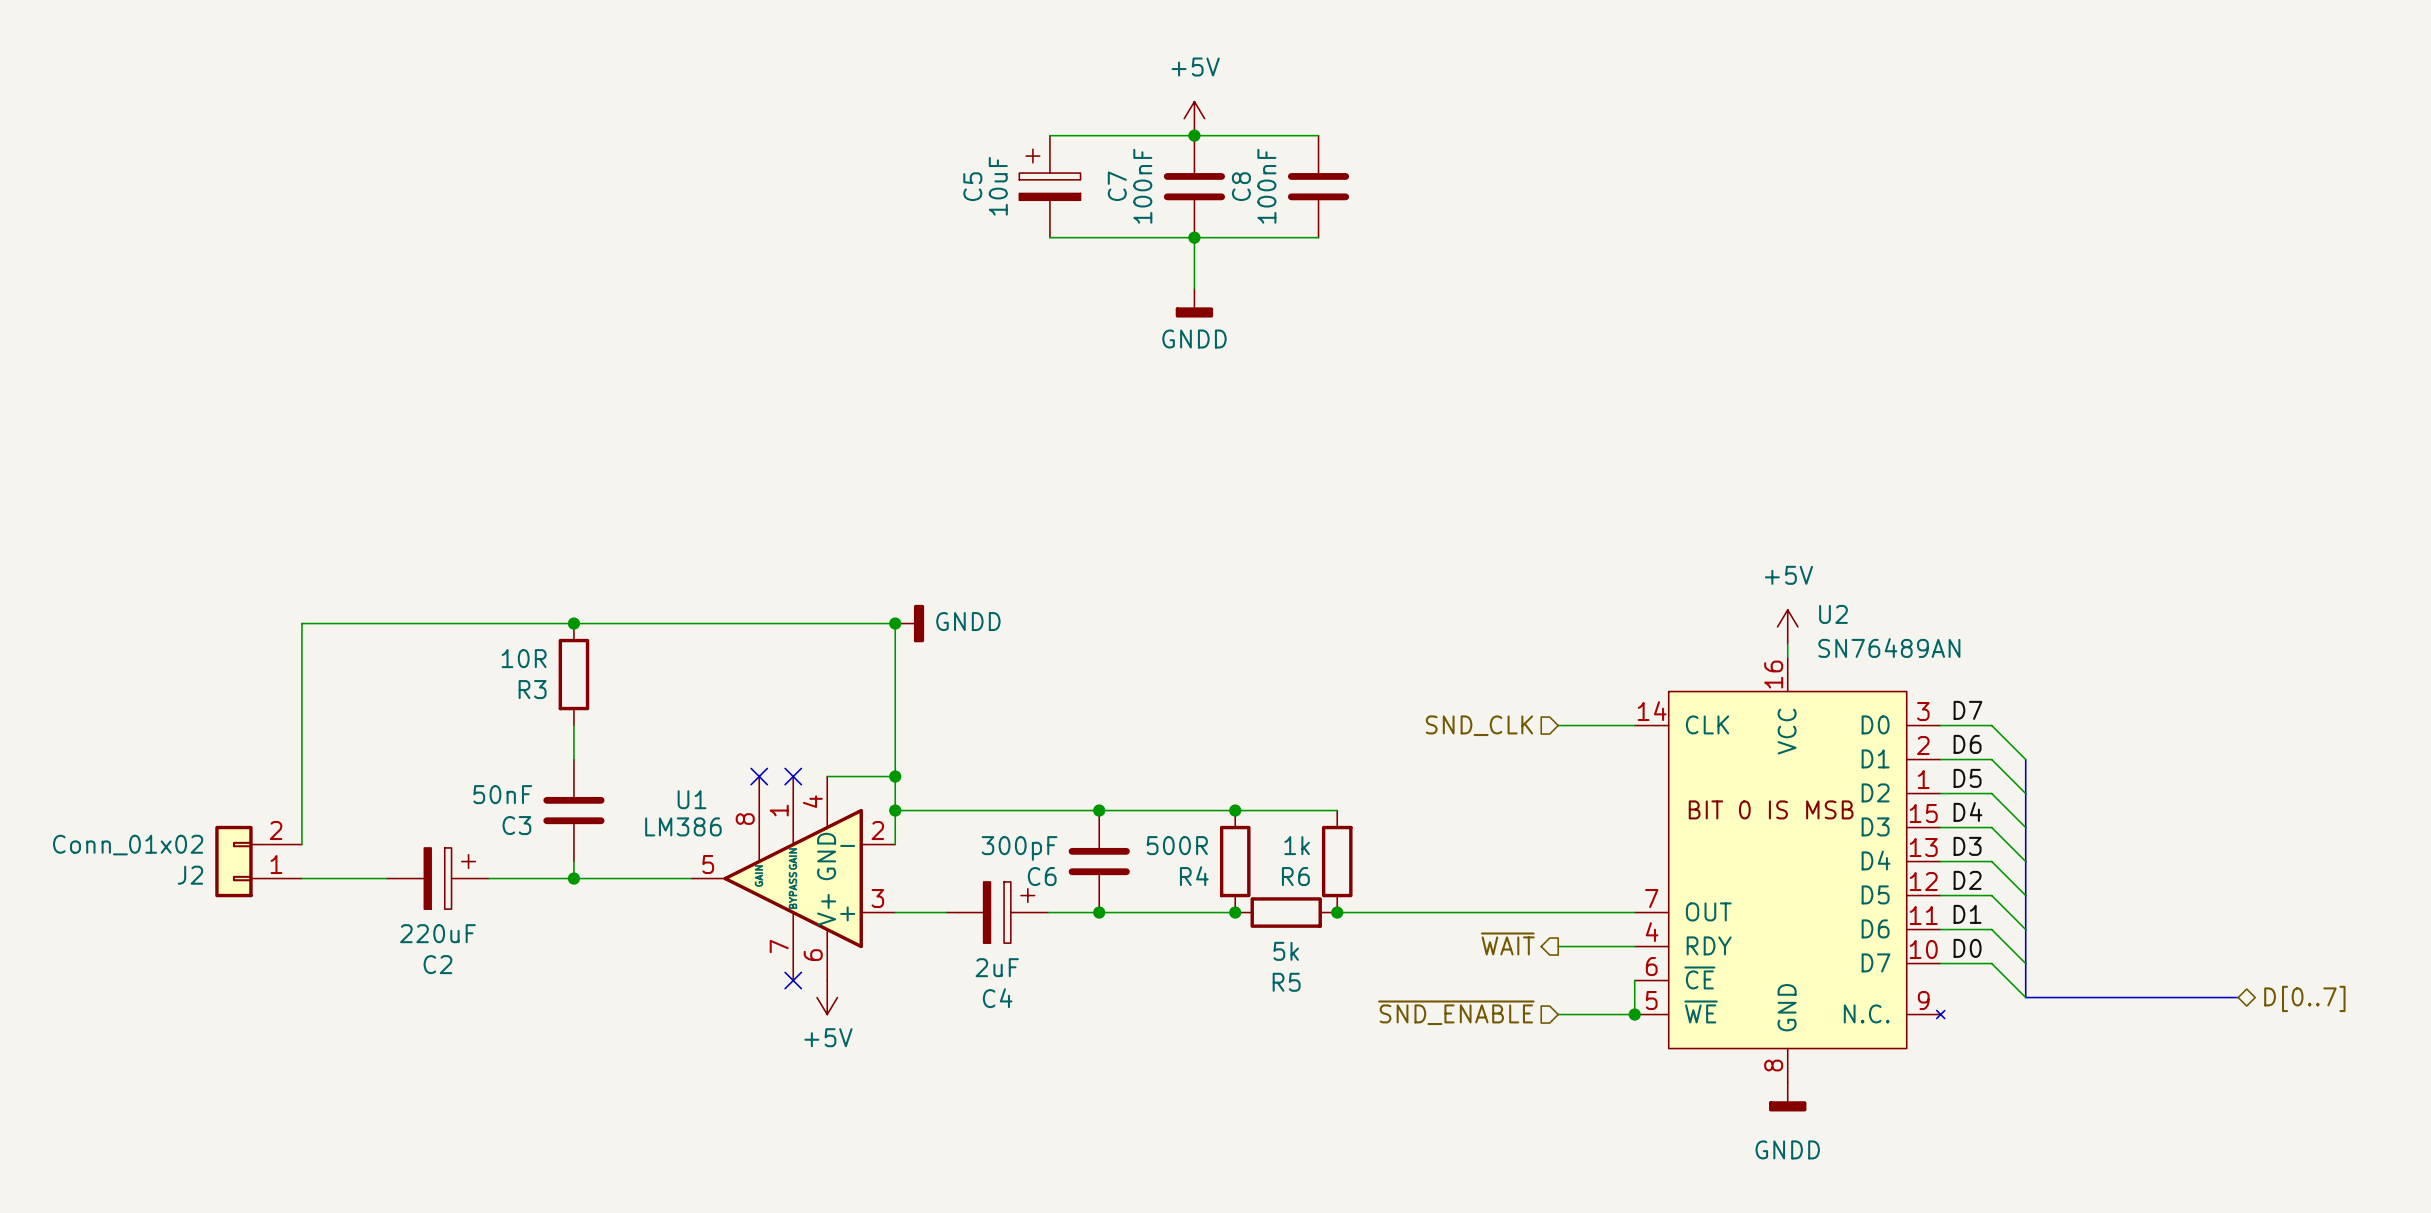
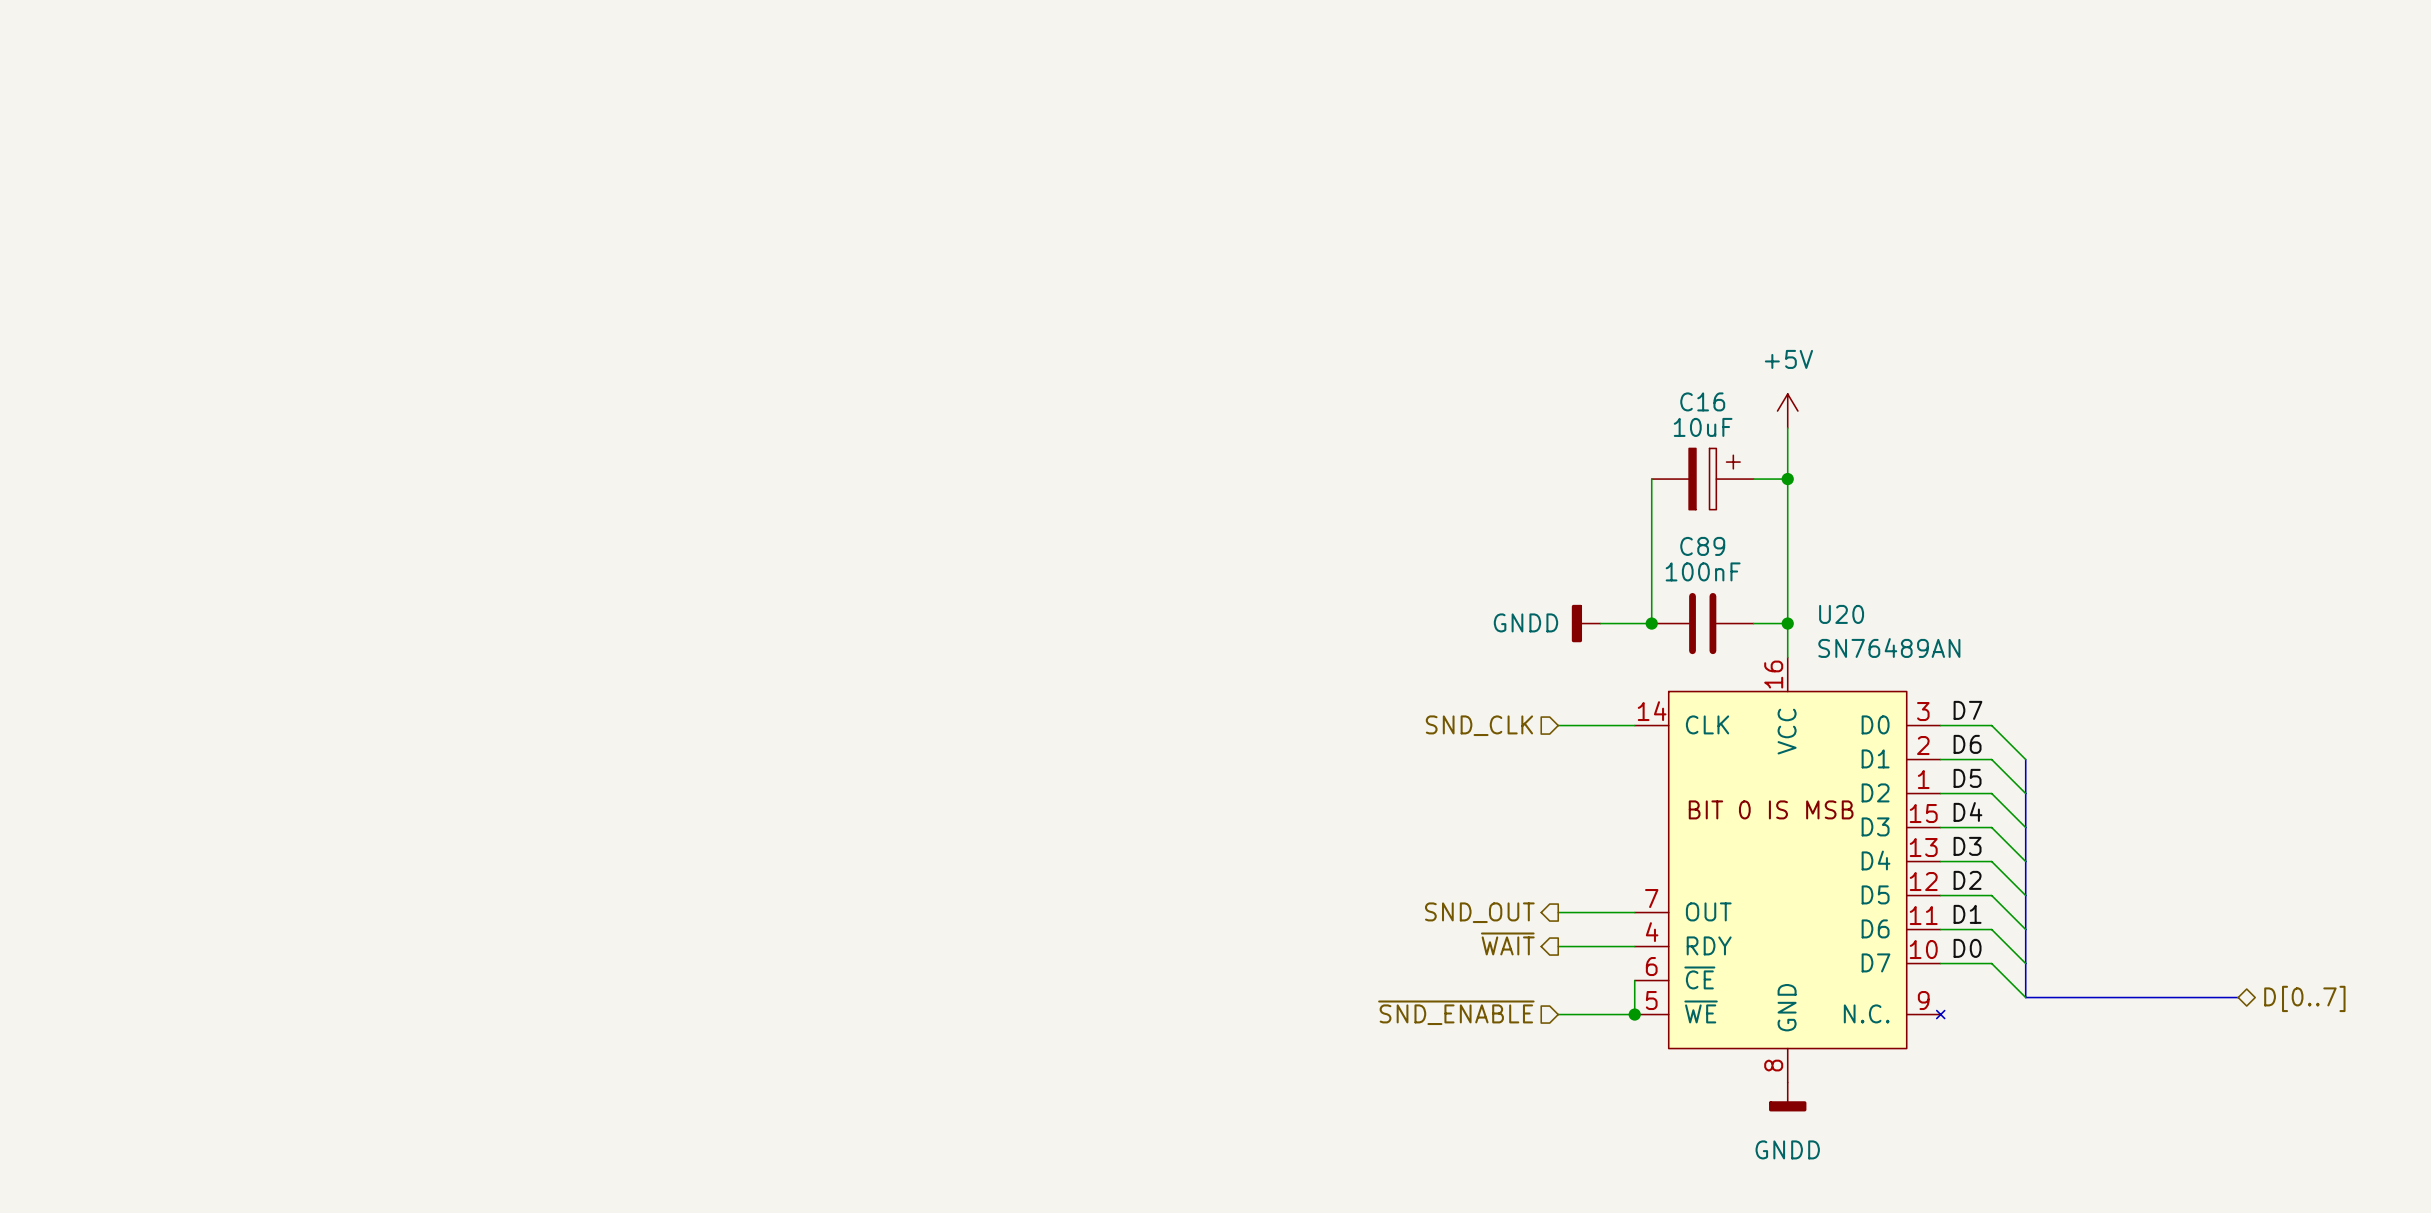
power symbol: +5V (1194, 118) -> none
wire: (1049, 135) (1318, 135) -> none
junction: (1194, 135) -> none
C5: 10uF (1049, 186) -> none
C7: 100nF (1194, 186) -> none
C8: 100nF (1318, 186) -> none
wire: (1049, 237) (1318, 237) -> none
wire: (1194, 237) (1194, 288) -> none
junction: (1194, 237) -> none
power symbol: GNDD (1194, 303) -> none
wire: none -> (1787, 428) (1787, 643)
wire: none -> (1651, 479) (1651, 623) (1600, 623)
C16: none -> 10uF (1702, 479)
wire: none -> (1753, 479) (1787, 479)
junction: none -> (1787, 479)
U2 name: U2 (1833, 614) -> U20 (1841, 614)
junction: (573, 623) -> none
junction: (895, 623) -> none
power symbol: GNDD (909, 623) -> none
power symbol: none -> GNDD (1586, 623)
junction: none -> (1651, 623)
C89: none -> 100nF (1702, 623)
wire: none -> (1753, 623) (1787, 623)
junction: none -> (1787, 623)
power symbol position: +5V (1787, 626) -> +5V (1787, 411)
R3: 10R (573, 674) -> none
wire: (573, 725) (573, 759) -> none
no-connect mark: (759, 776) -> none
no-connect mark: (793, 776) -> none
wire: (827, 776) (895, 776) -> none
junction: (895, 776) -> none
C3: 50nF (573, 810) -> none
wire: (895, 810) (1337, 810) -> none
junction: (895, 810) -> none
junction: (1099, 810) -> none
junction: (1235, 810) -> none
wire: (301, 844) (301, 623) (895, 623) (895, 844) -> none
J2: Conn_01x02 (258, 861) -> none
wire: (573, 861) (573, 878) -> none
C6: 300pF (1099, 861) -> none
R4: 500R (1235, 861) -> none
R6: 1k (1337, 861) -> none
wire: (301, 878) (386, 878) -> none
C2: 220uF (437, 878) -> none
wire: (488, 878) (691, 878) -> none
junction: (573, 878) -> none
U1: LM386 (793, 878) -> none
wire: (895, 912) (946, 912) -> none
C4: 2uF (997, 912) -> none
wire: (1048, 912) (1235, 912) -> none
junction: (1099, 912) -> none
junction: (1235, 912) -> none
R5: 5k (1286, 912) -> none
wire: (1337, 912) (1558, 912) -> none
junction: (1337, 912) -> none
hierarchical label: none -> SND_OUT (1479, 912)
no-connect mark: (793, 980) -> none
power symbol: +5V (827, 997) -> none

